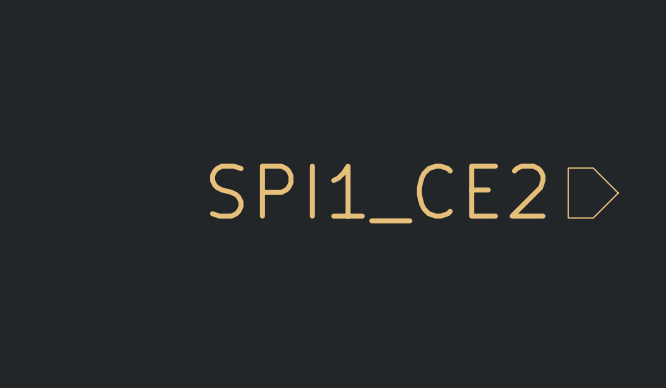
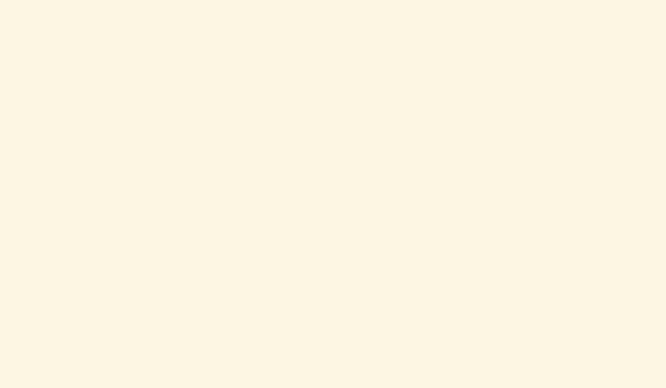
hierarchical label: SPI1_CE2 (377, 193) -> none

